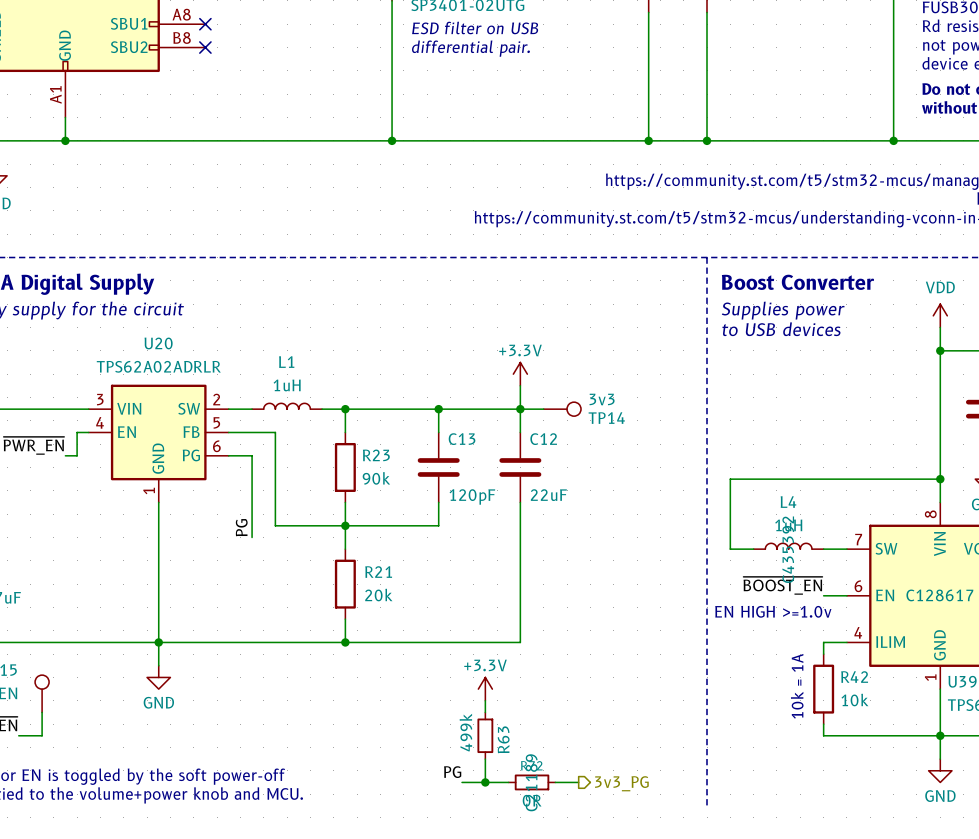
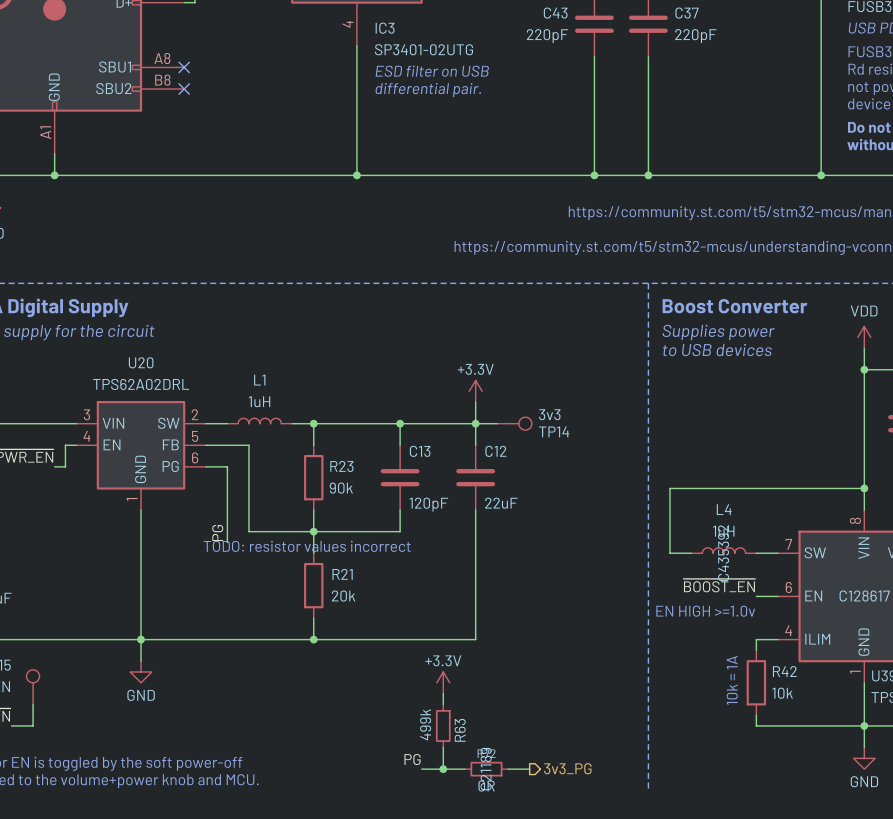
U20 value: TPS62A02ADRLR (158, 366) -> TPS62A02DRL (141, 384)
text: none -> TODO: resistor values incorrect (307, 546)

